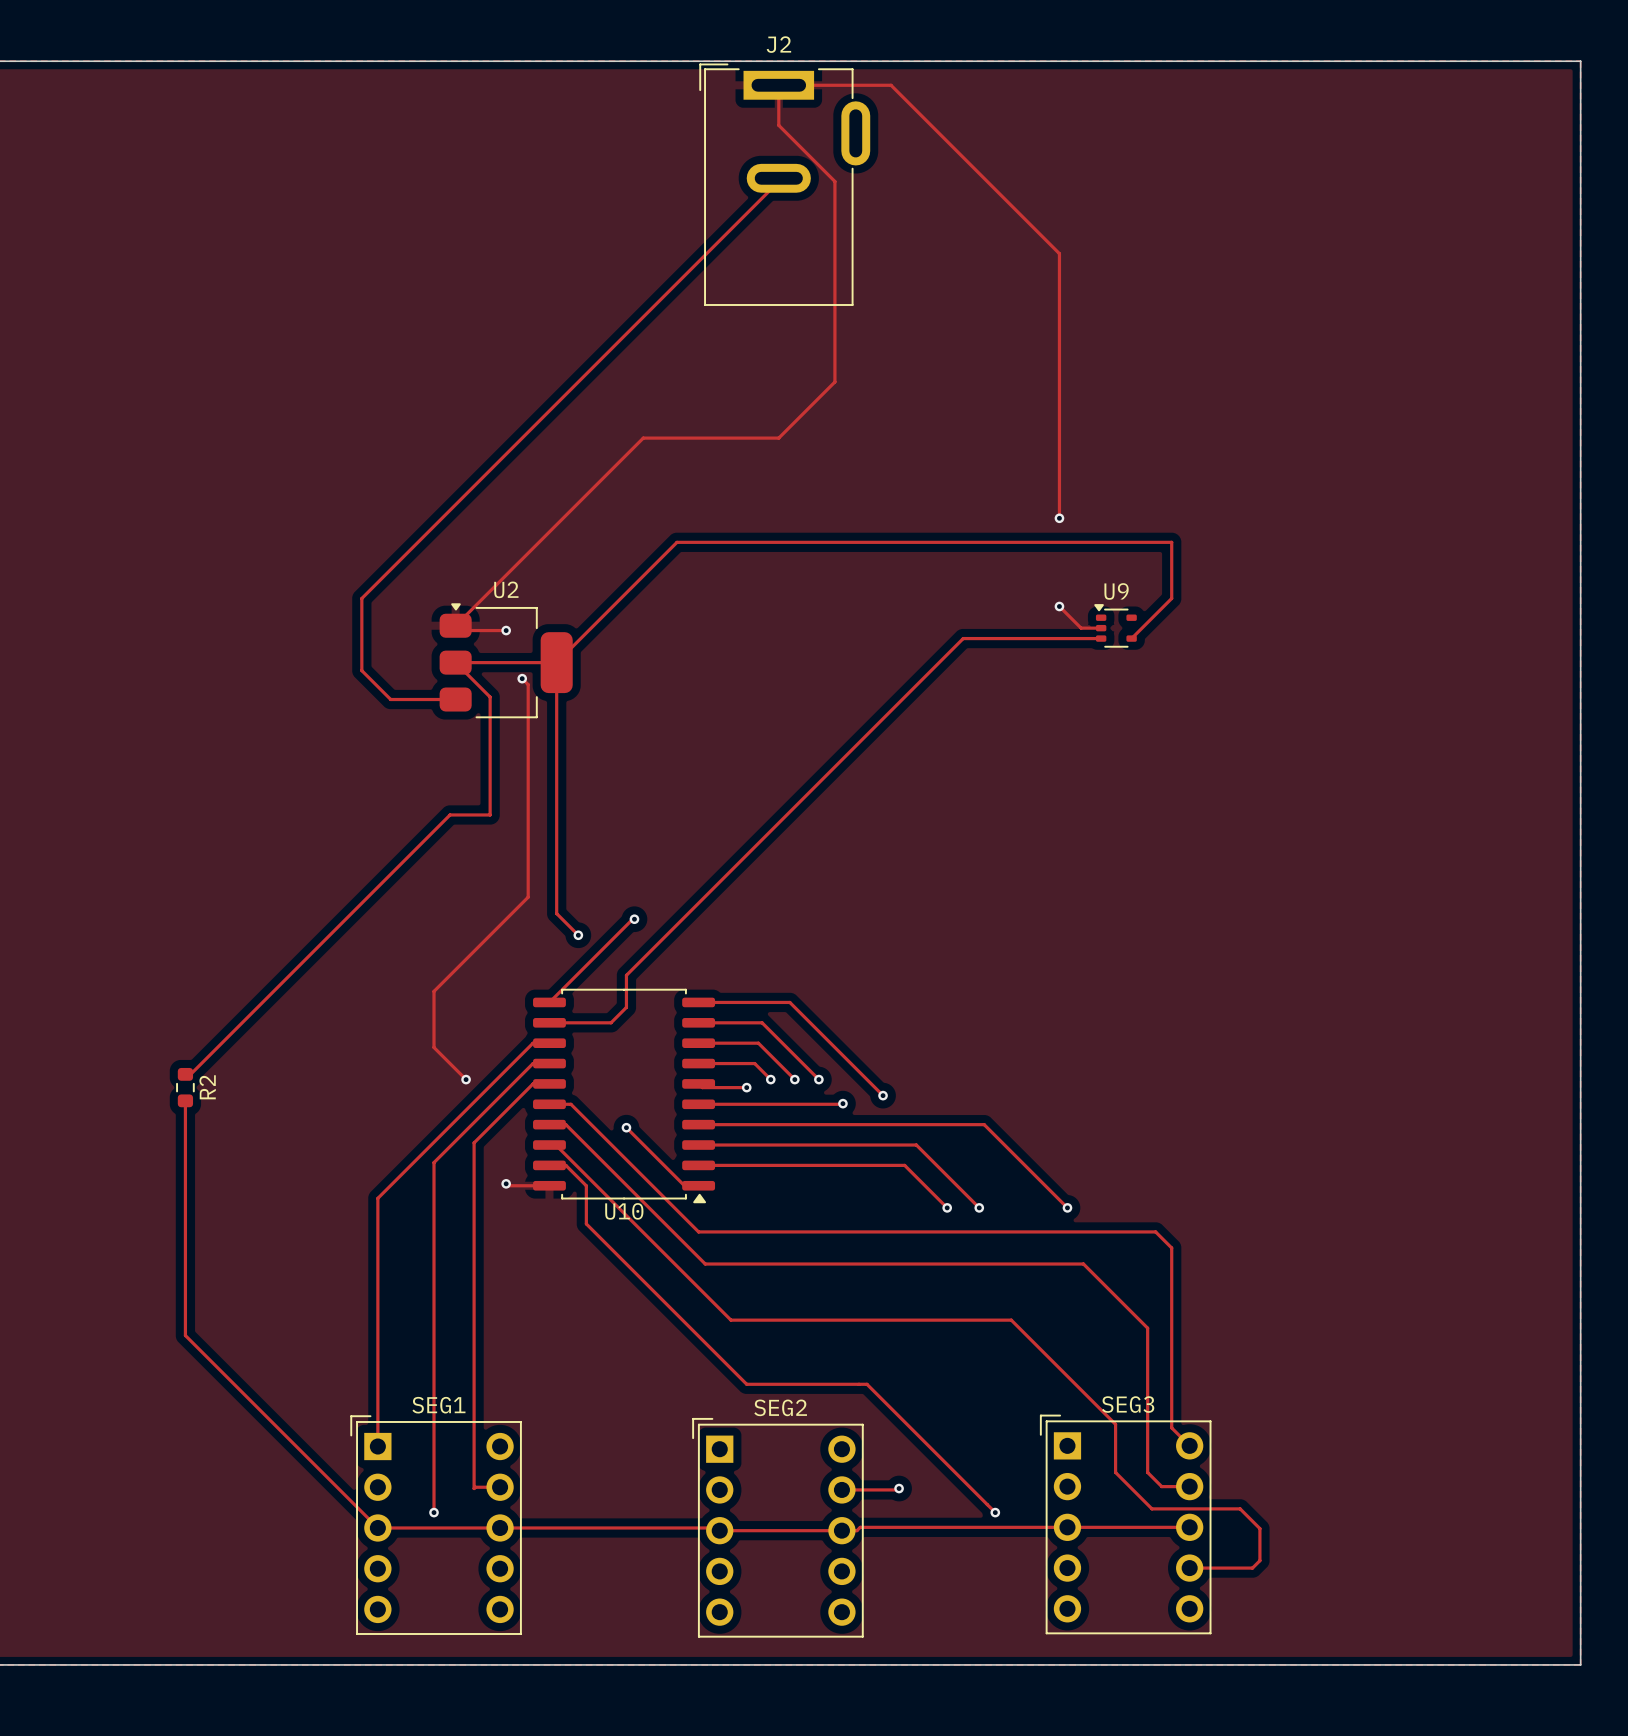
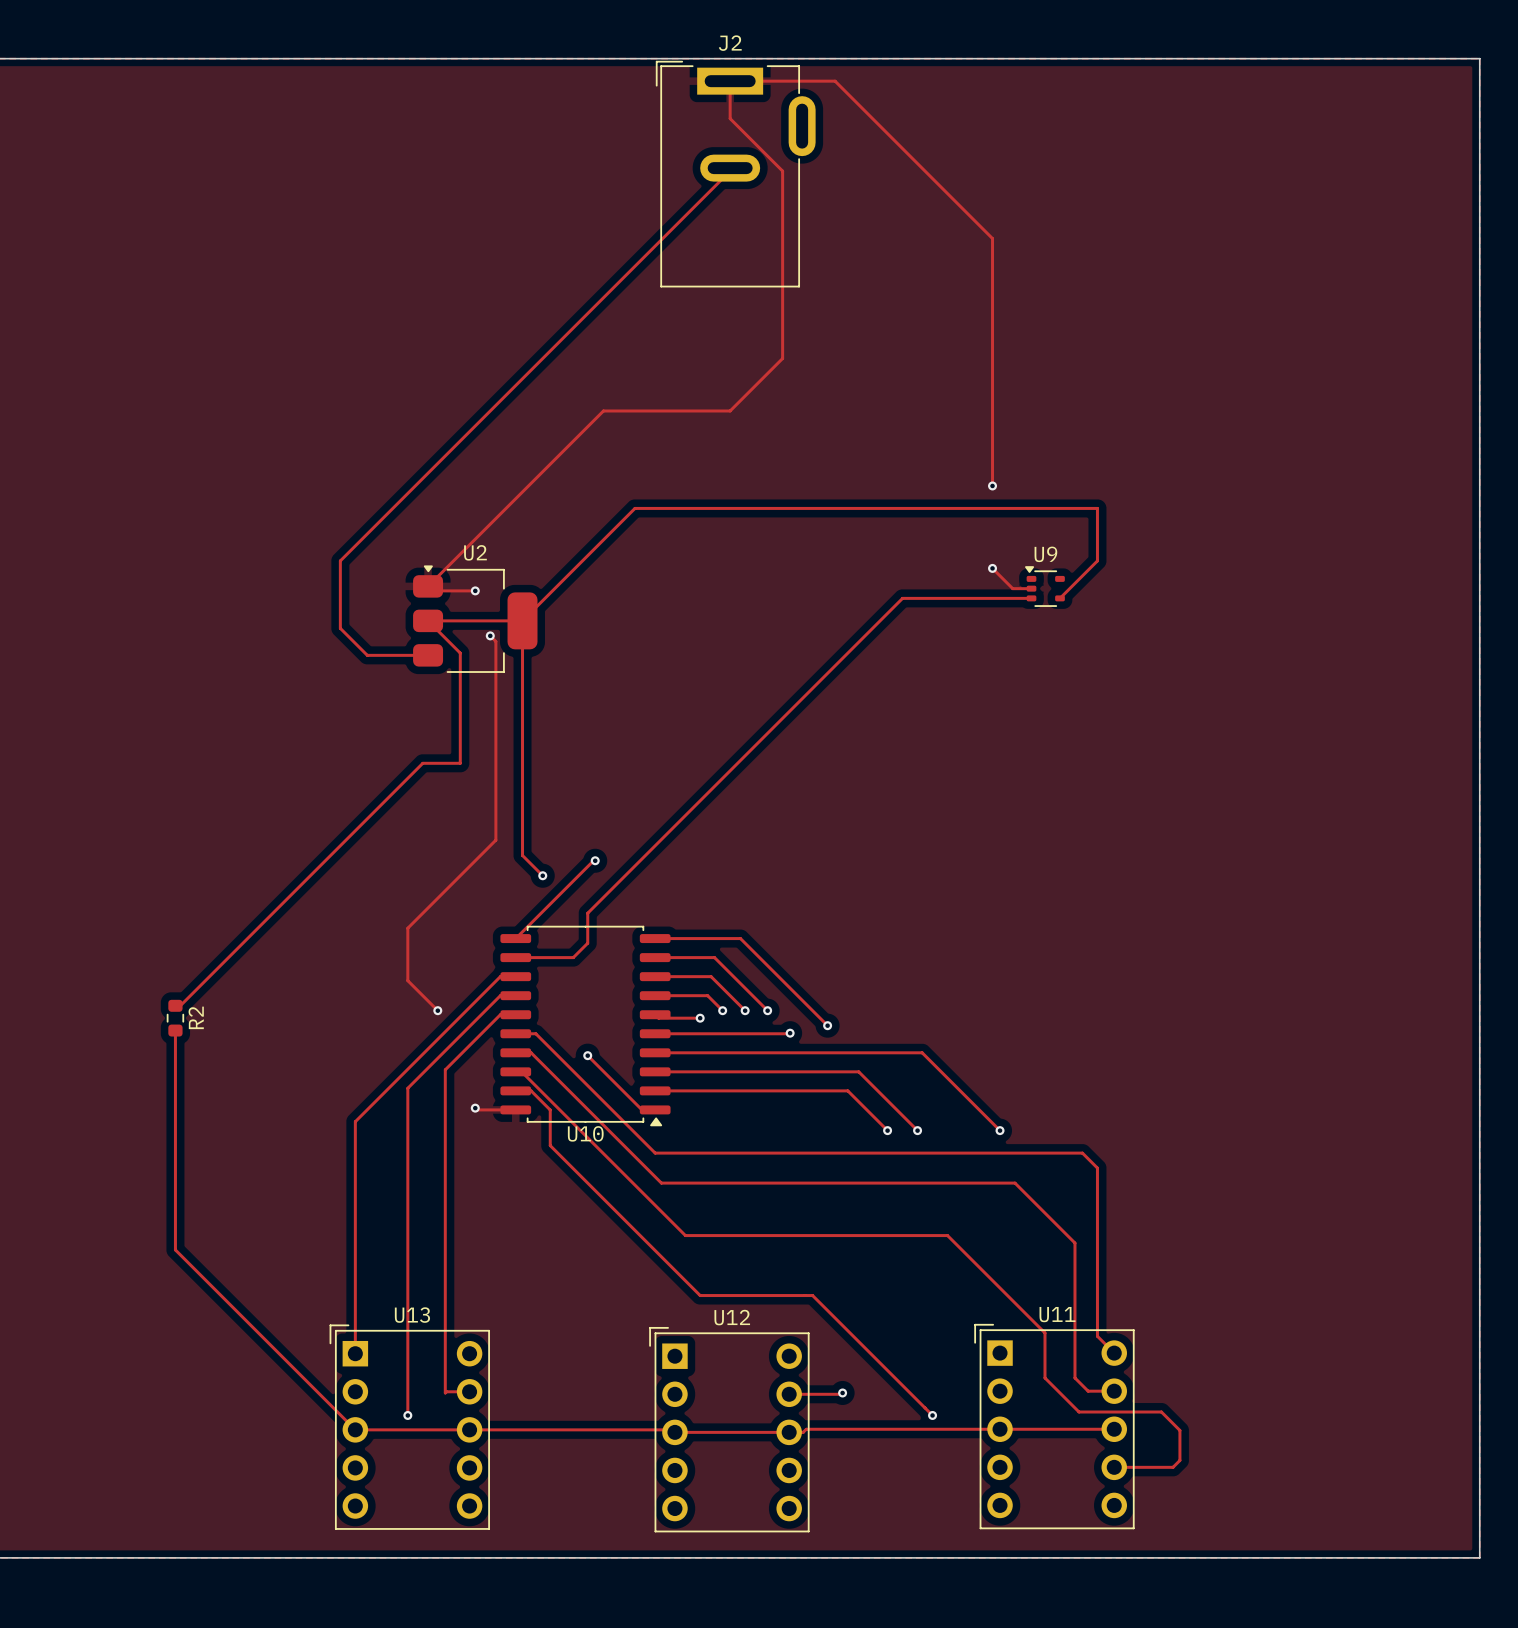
SEG3 name: SEG3 (1128, 1404) -> U11 (1057, 1314)
SEG1 name: SEG1 (438, 1405) -> U13 (412, 1315)
SEG2 name: SEG2 (780, 1407) -> U12 (732, 1317)

